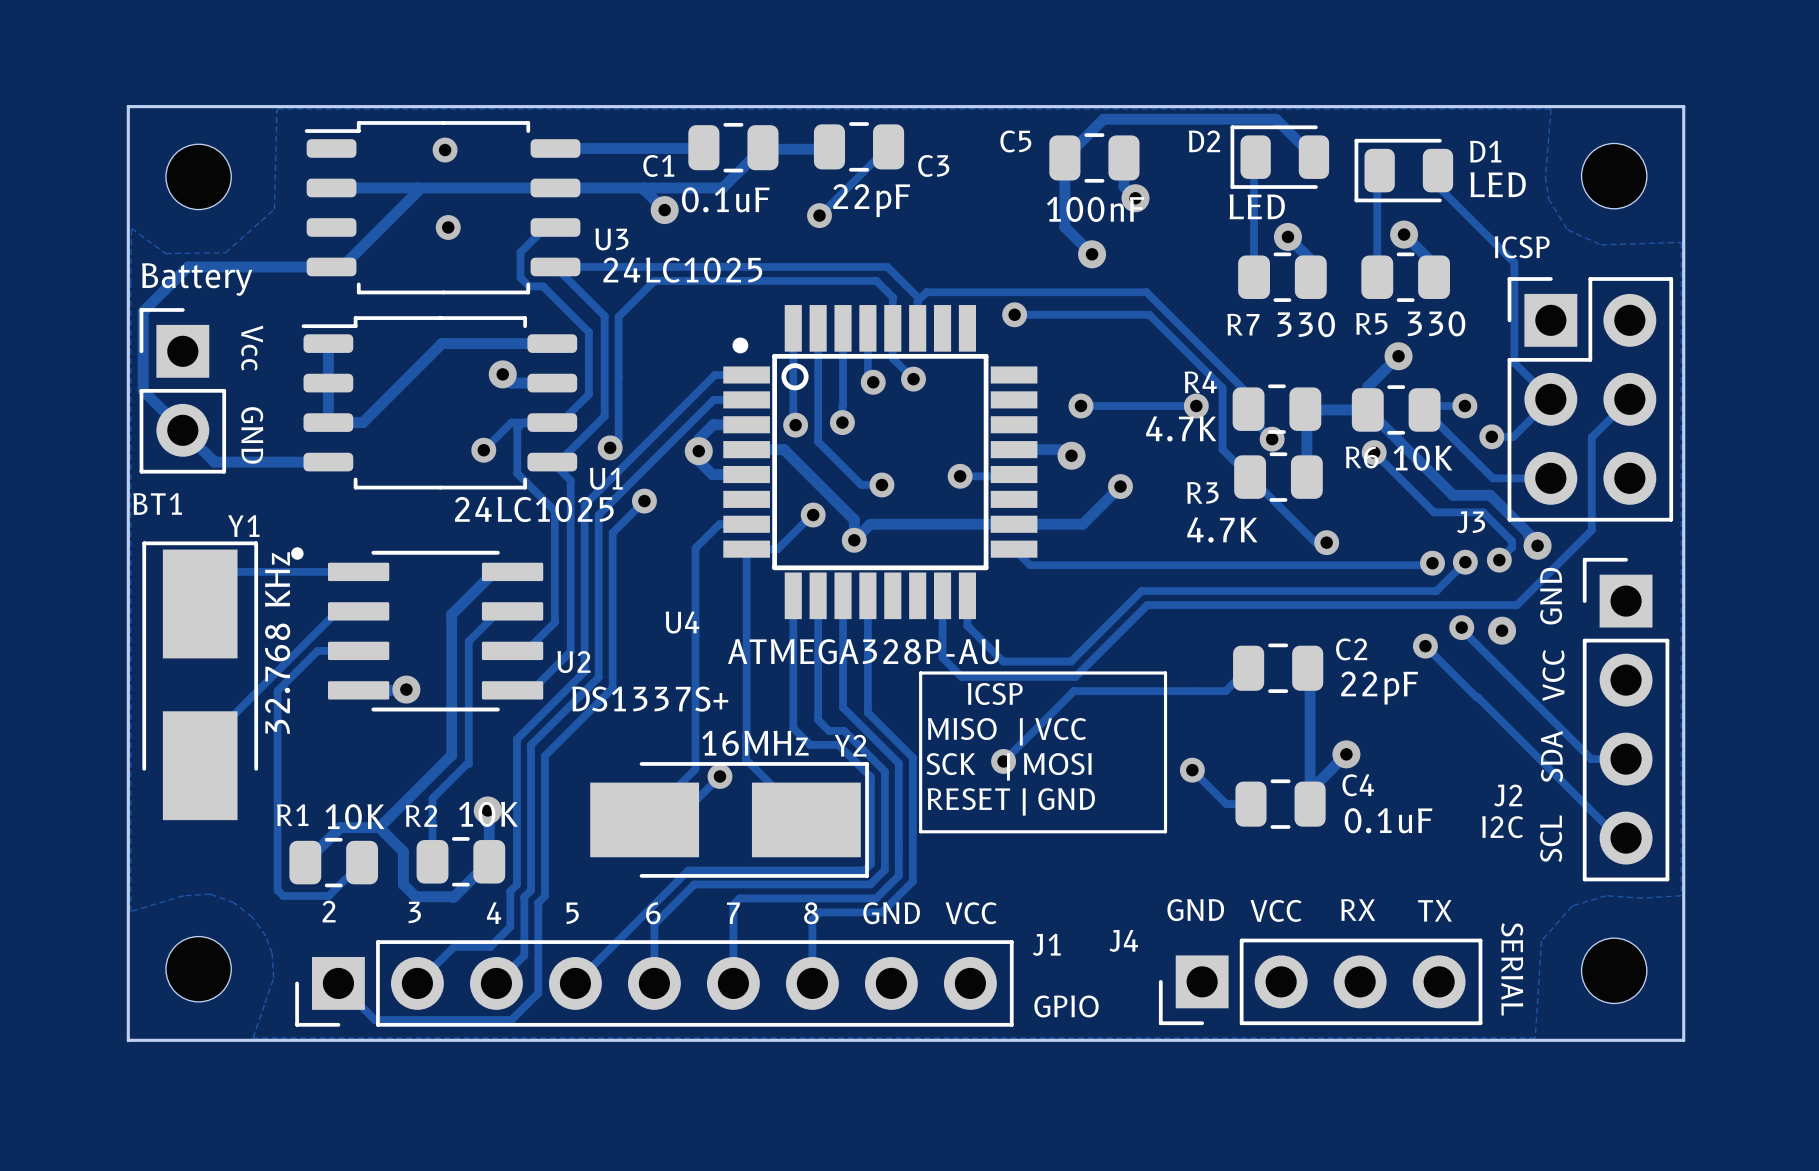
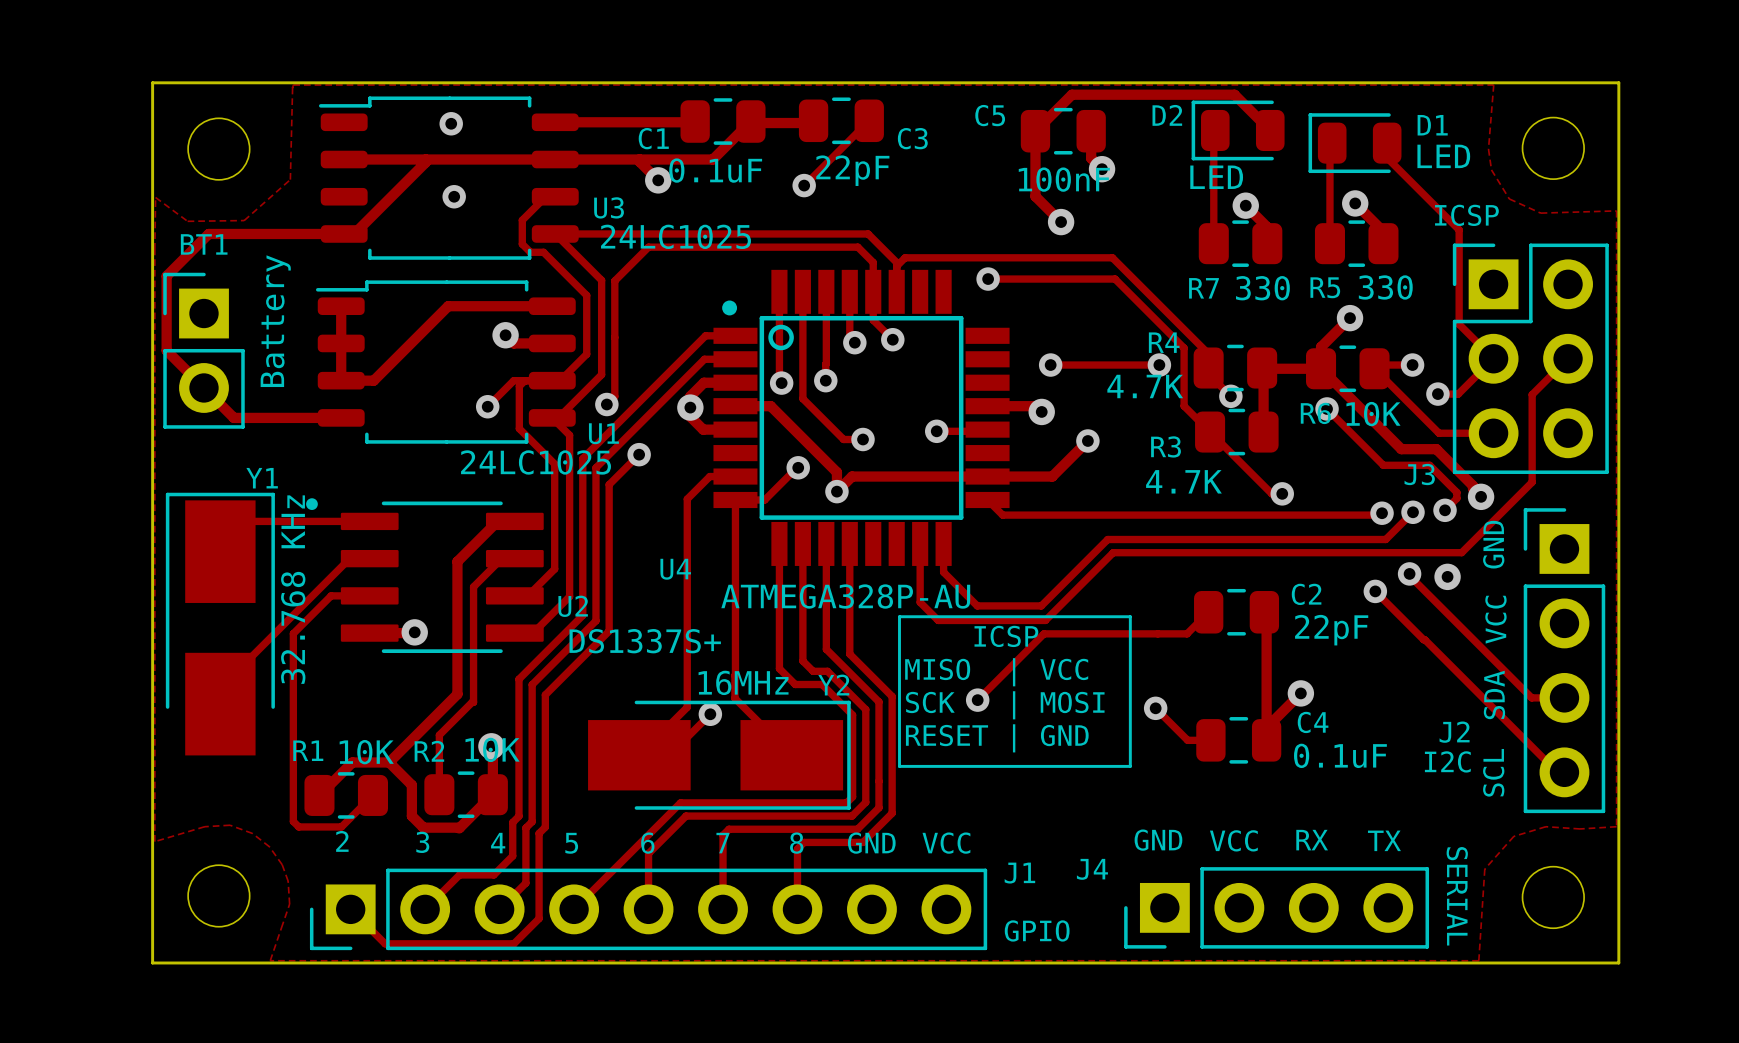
BT1 value rotation: 0° (197, 279) -> 90° counterclockwise (275, 321)
text: Vcc (252, 348) -> none
text: GND (252, 435) -> none
BT1 name position: BT1 (157, 503) -> BT1 (204, 244)

